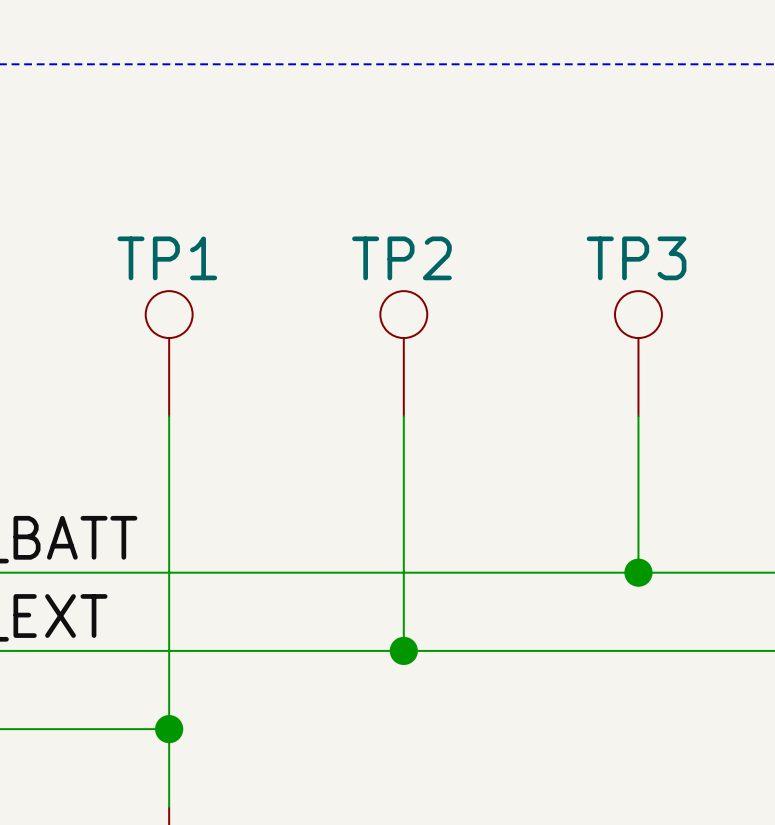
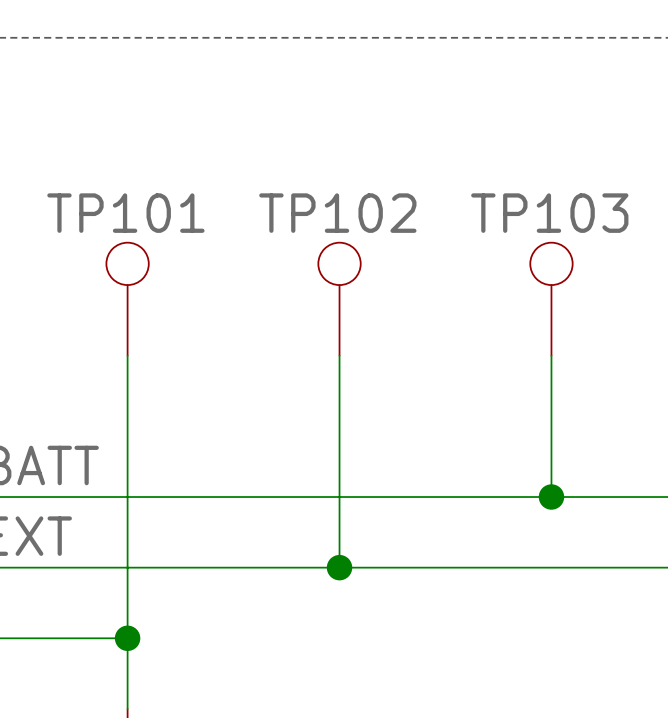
TP1 name: TP1 (167, 258) -> TP101 (125, 213)
TP2 name: TP2 (401, 258) -> TP102 (337, 213)
TP3 name: TP3 (636, 258) -> TP103 (549, 213)

